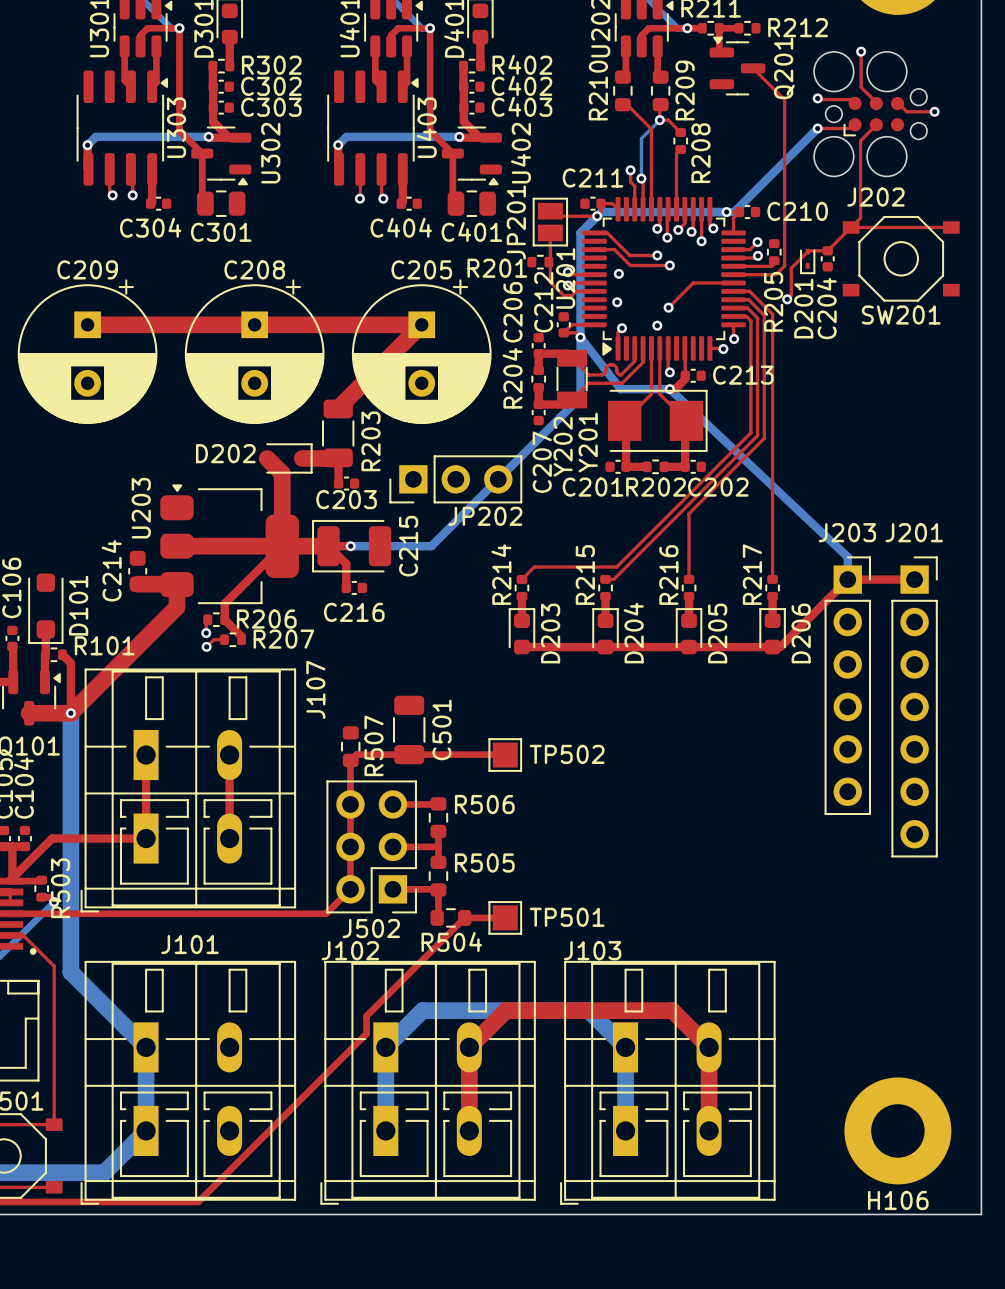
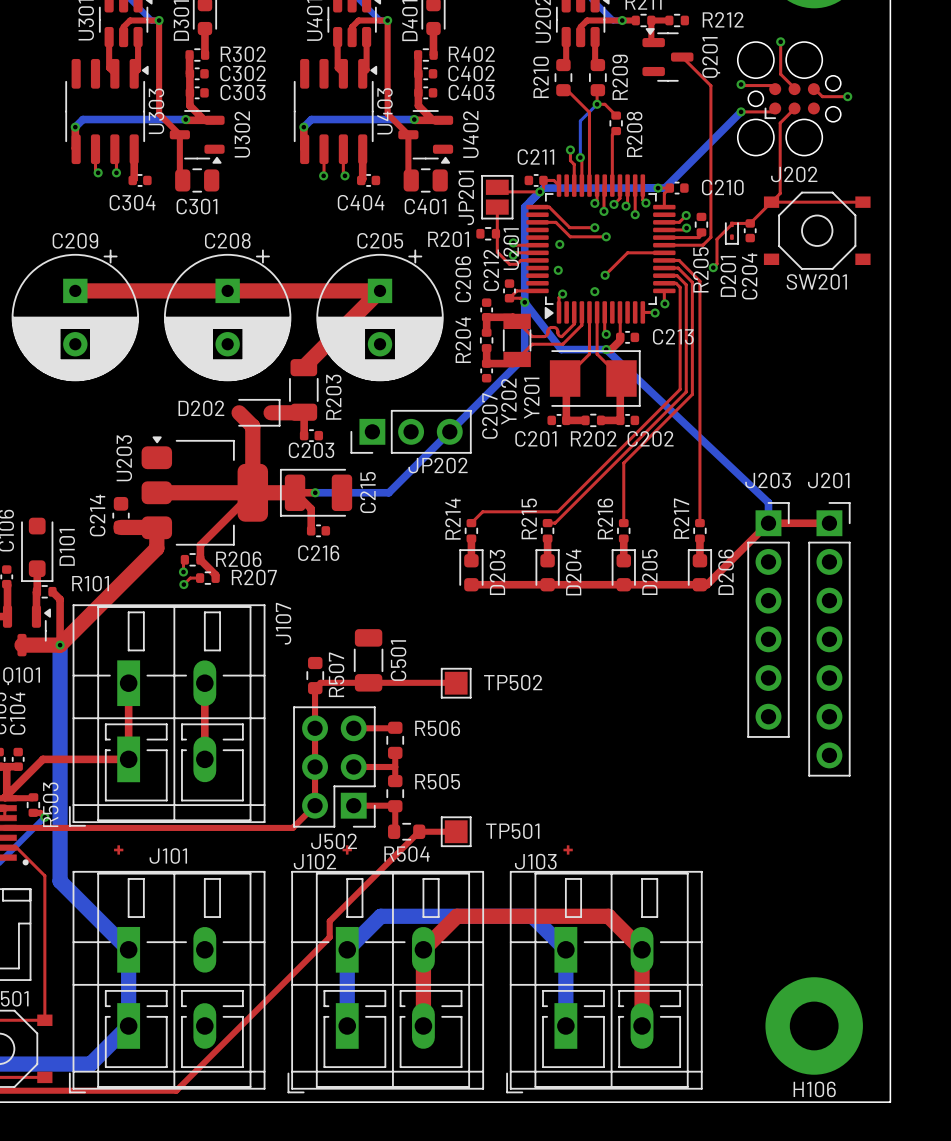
text: none -> + (118, 849)
text: none -> + (347, 849)
text: none -> + (568, 849)

